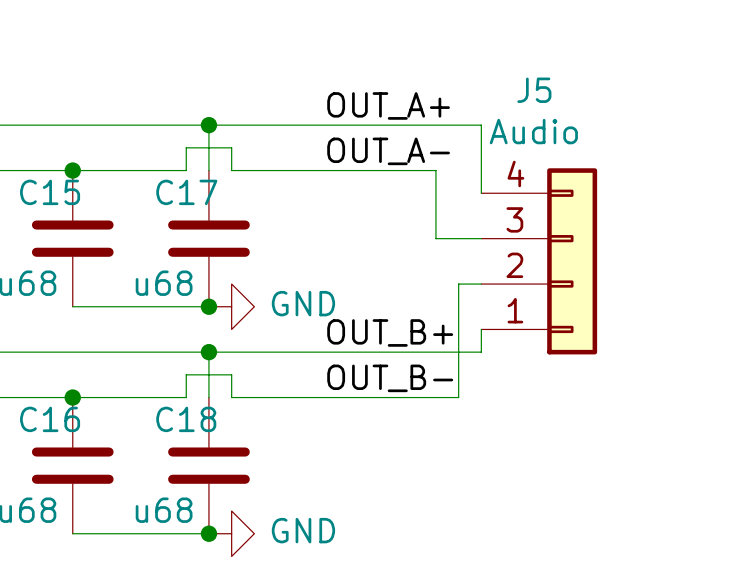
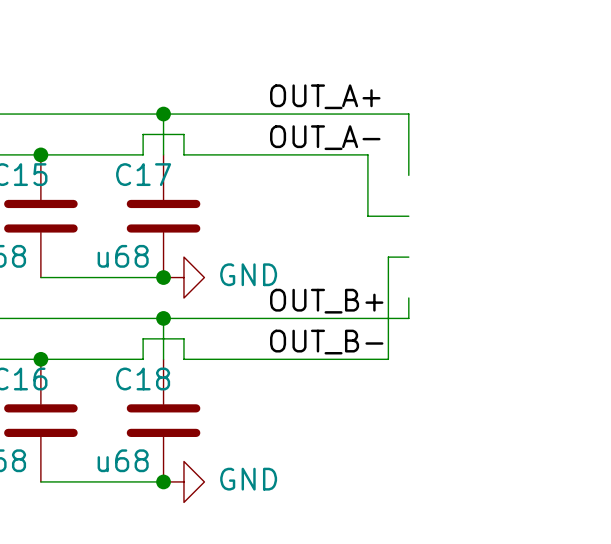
J5: Audio (539, 261) -> none

